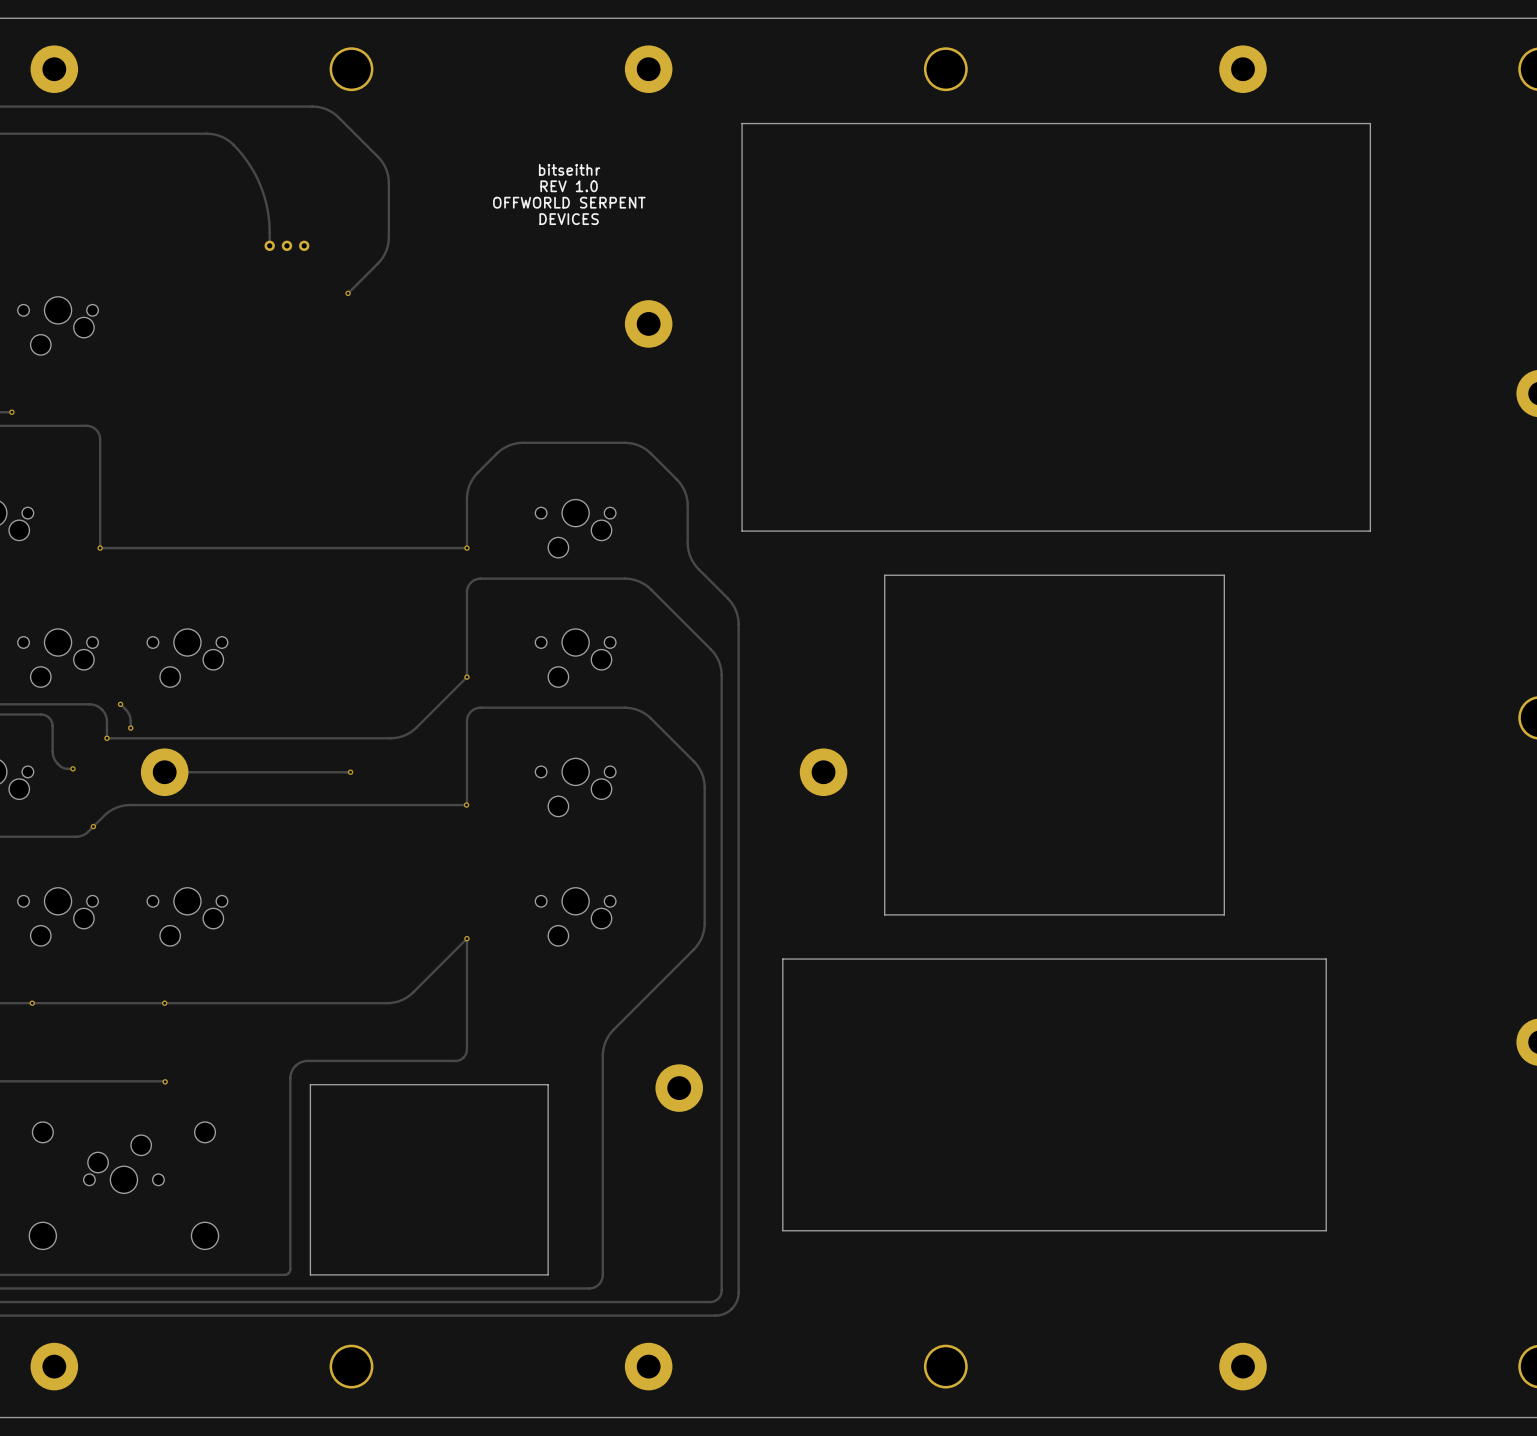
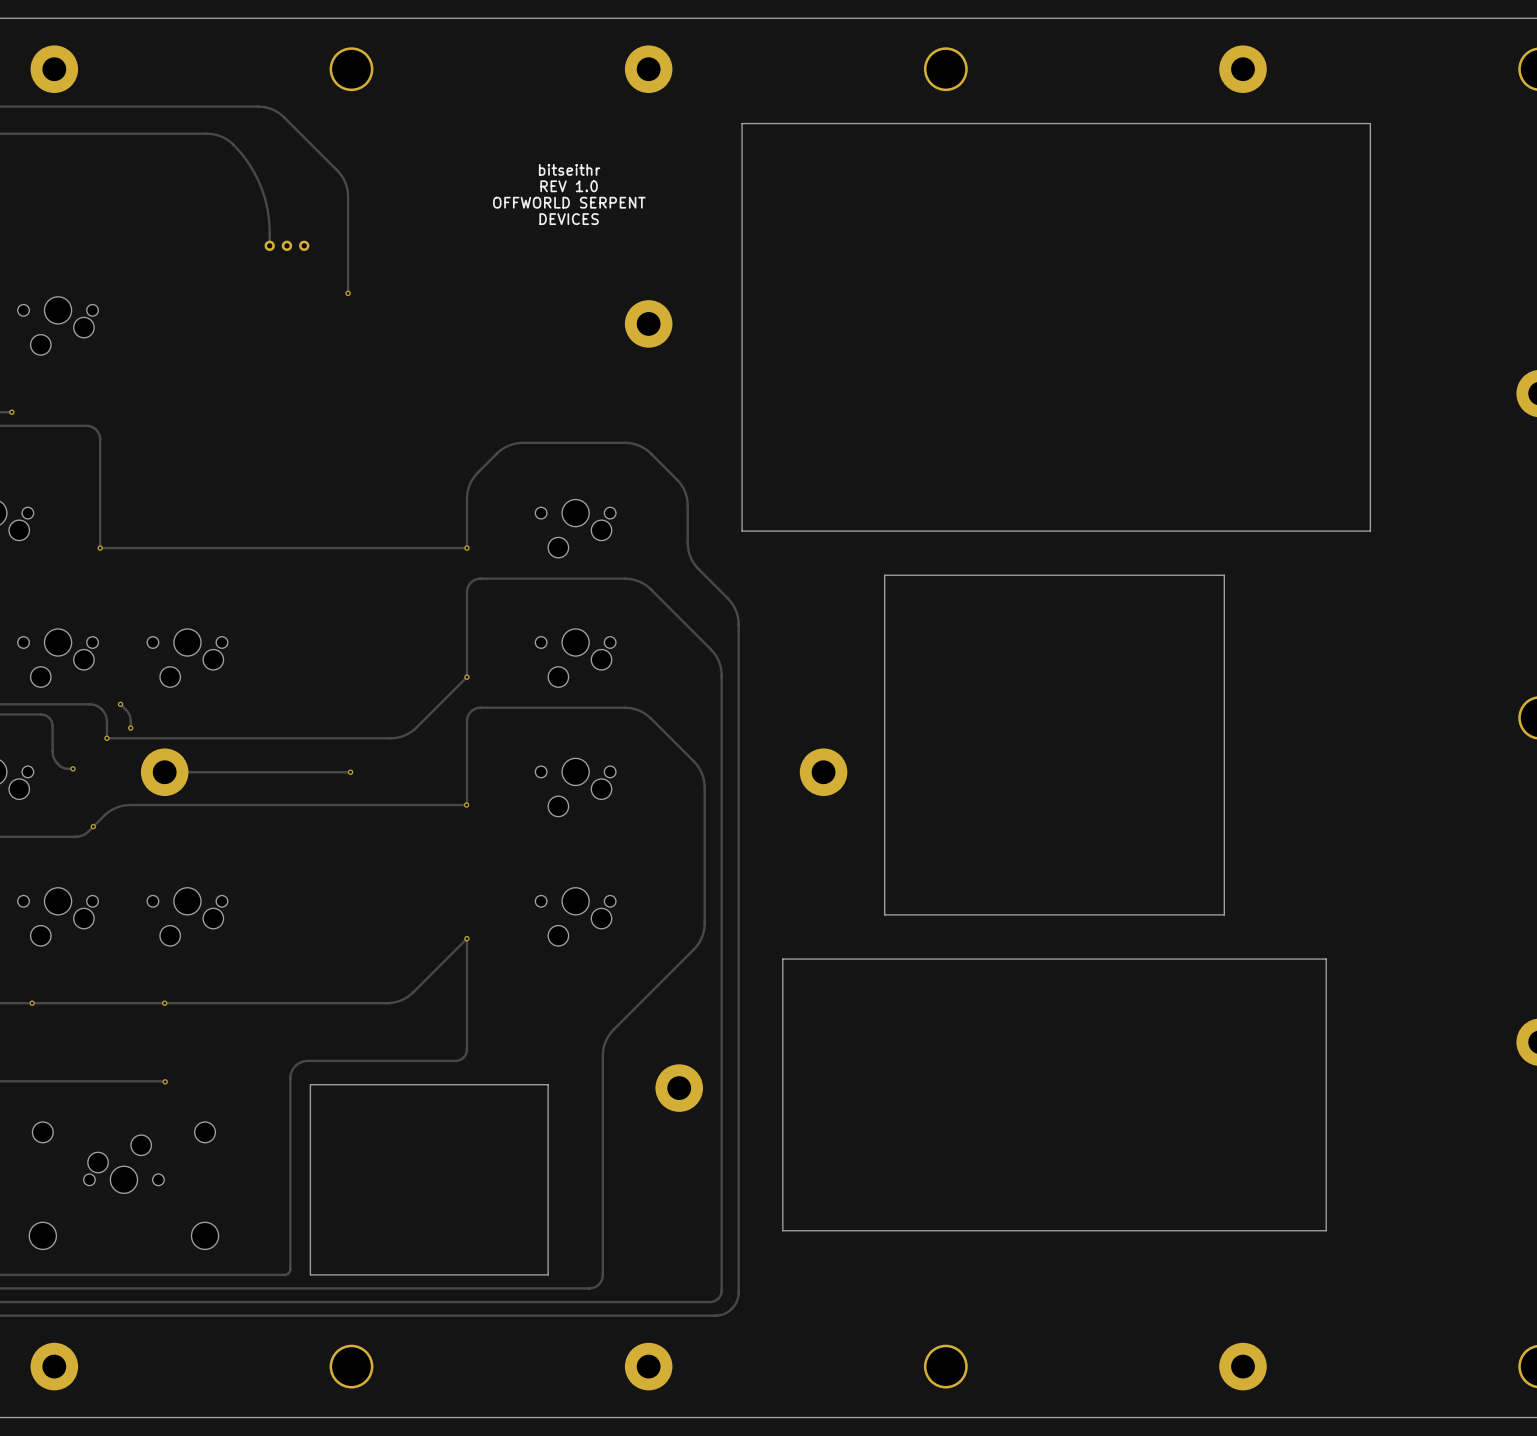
track: (258, 106) (312, 106) (326, 109) (338, 117) (384, 165) (388, 183) (387, 248) (380, 260) (348, 293) -> (258, 106) (272, 109) (281, 114) (343, 179) (348, 196) (348, 293)

